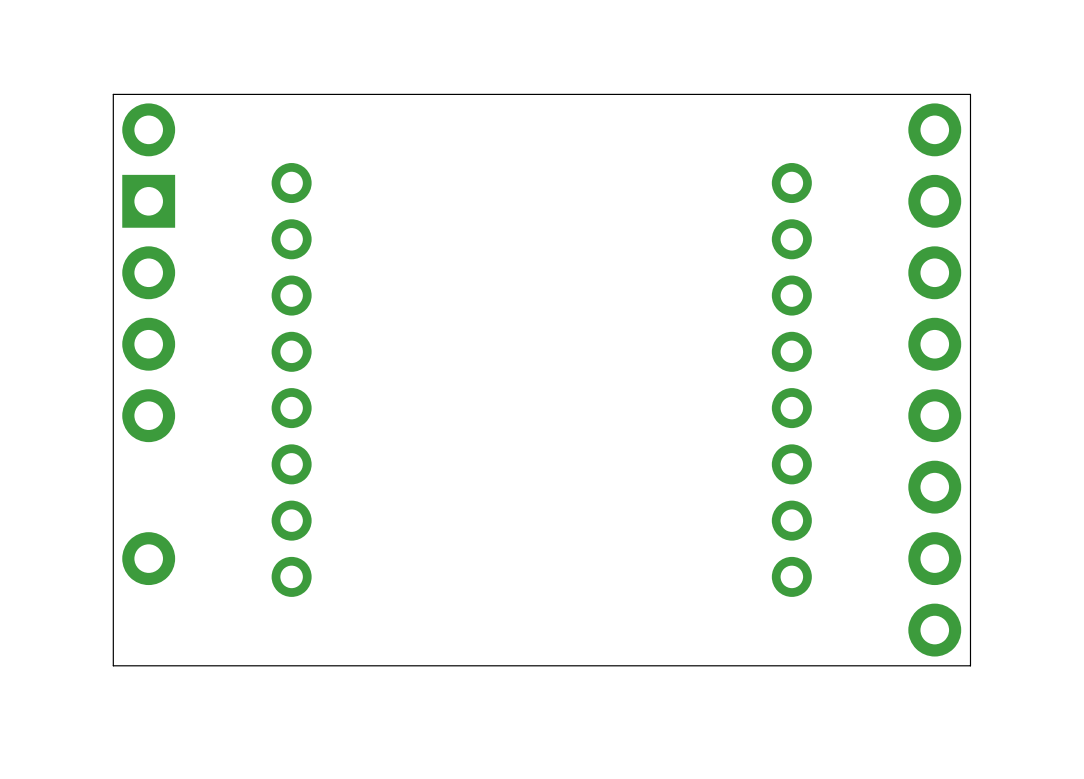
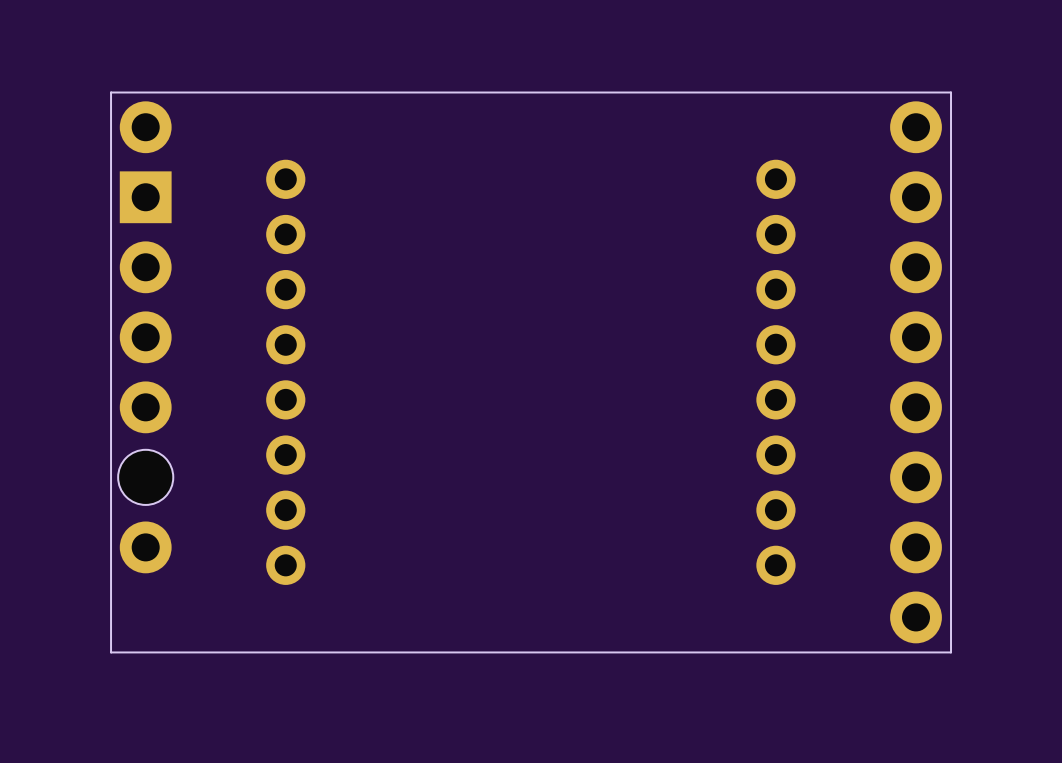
hole: none -> (145, 477)

